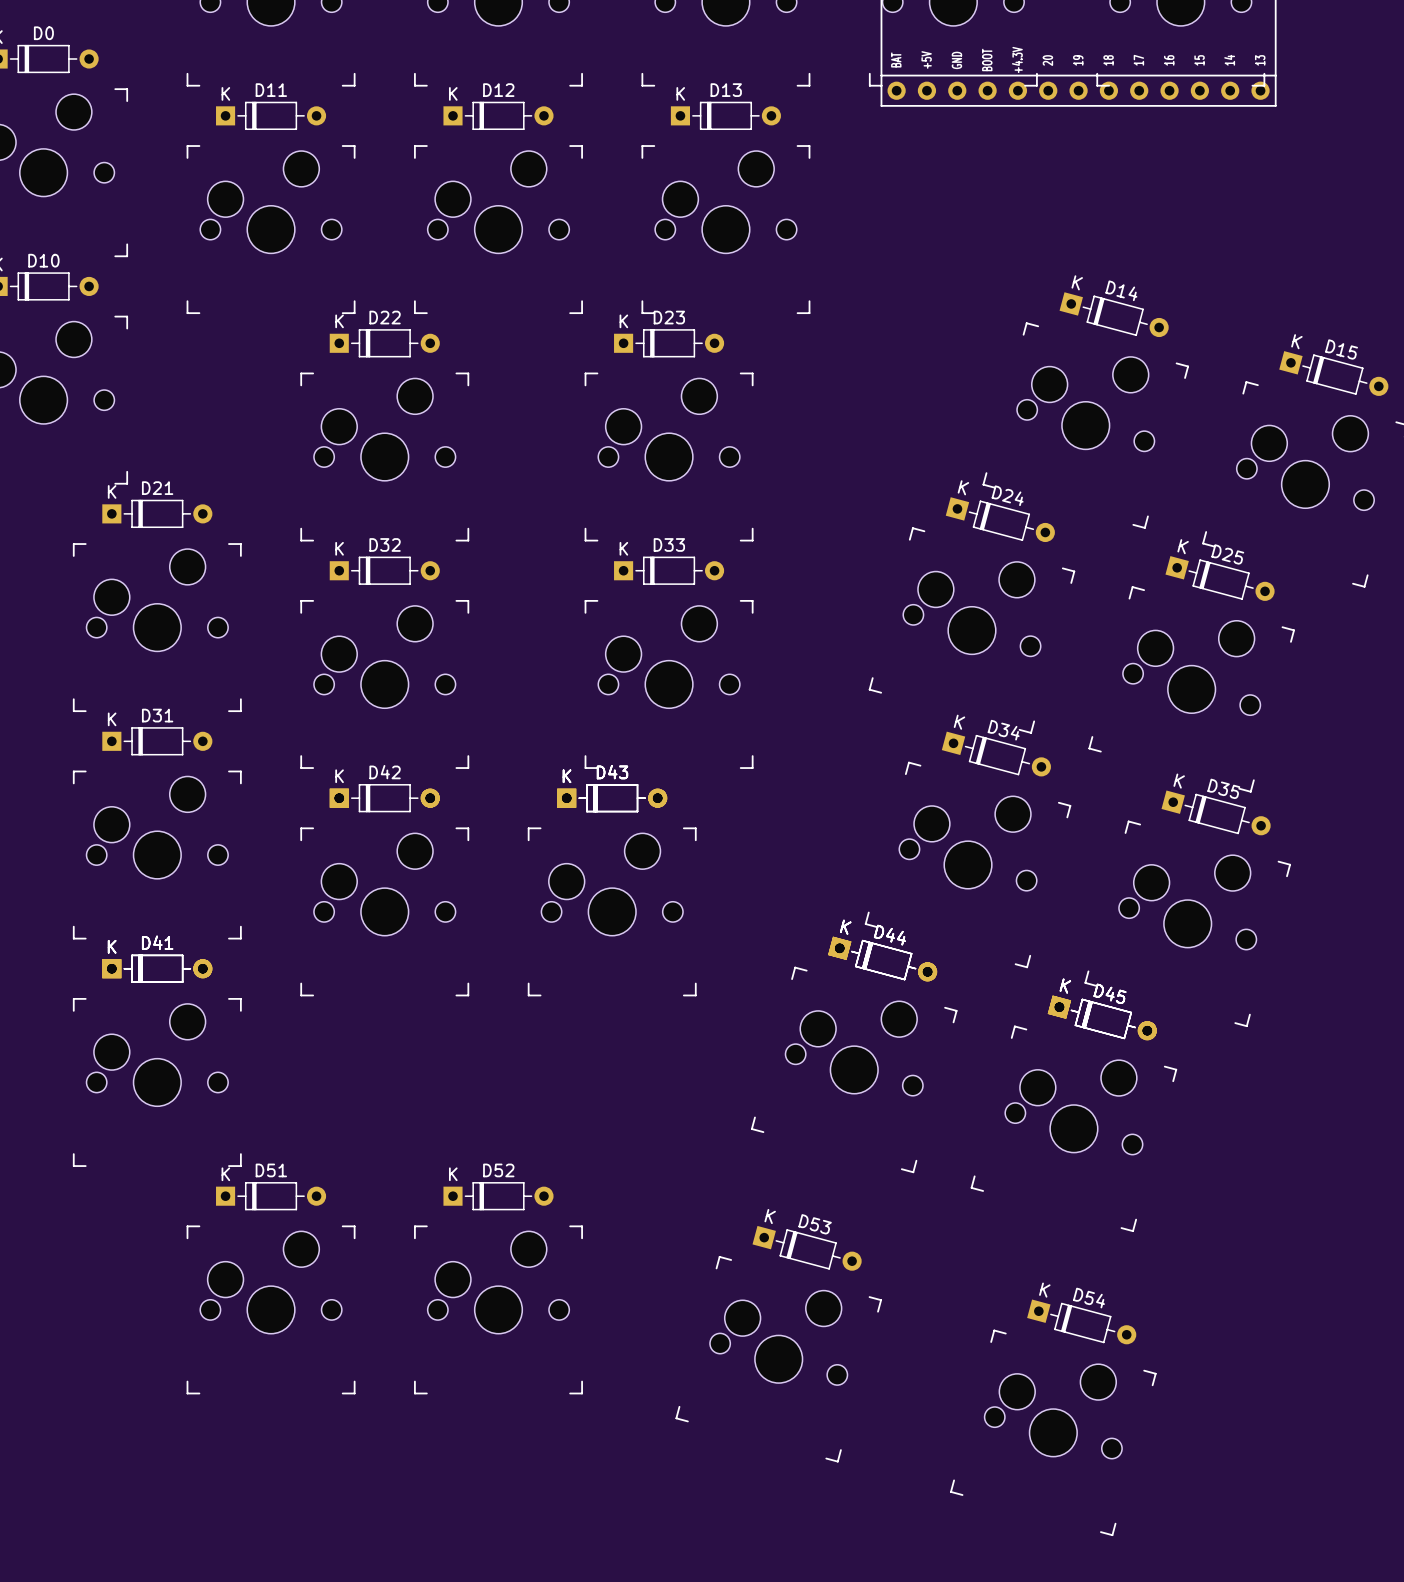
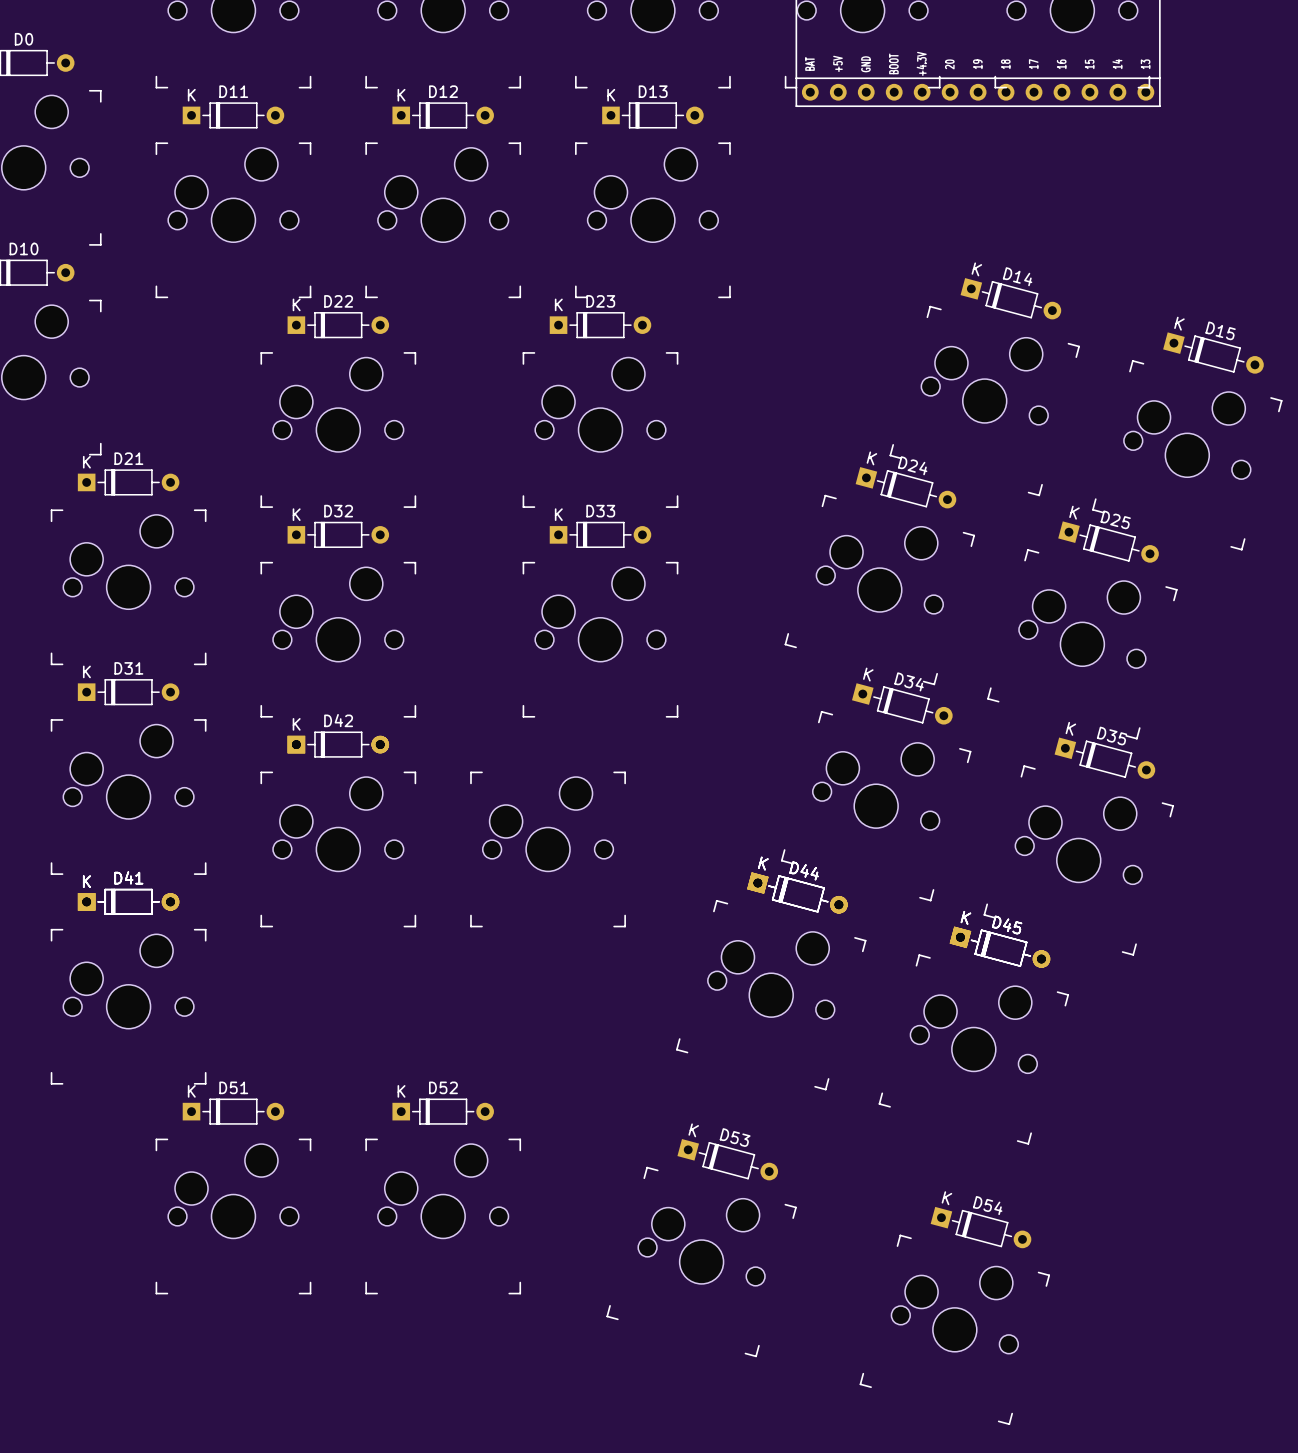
D43: (612, 798) -> none
D43: (612, 798) -> none

